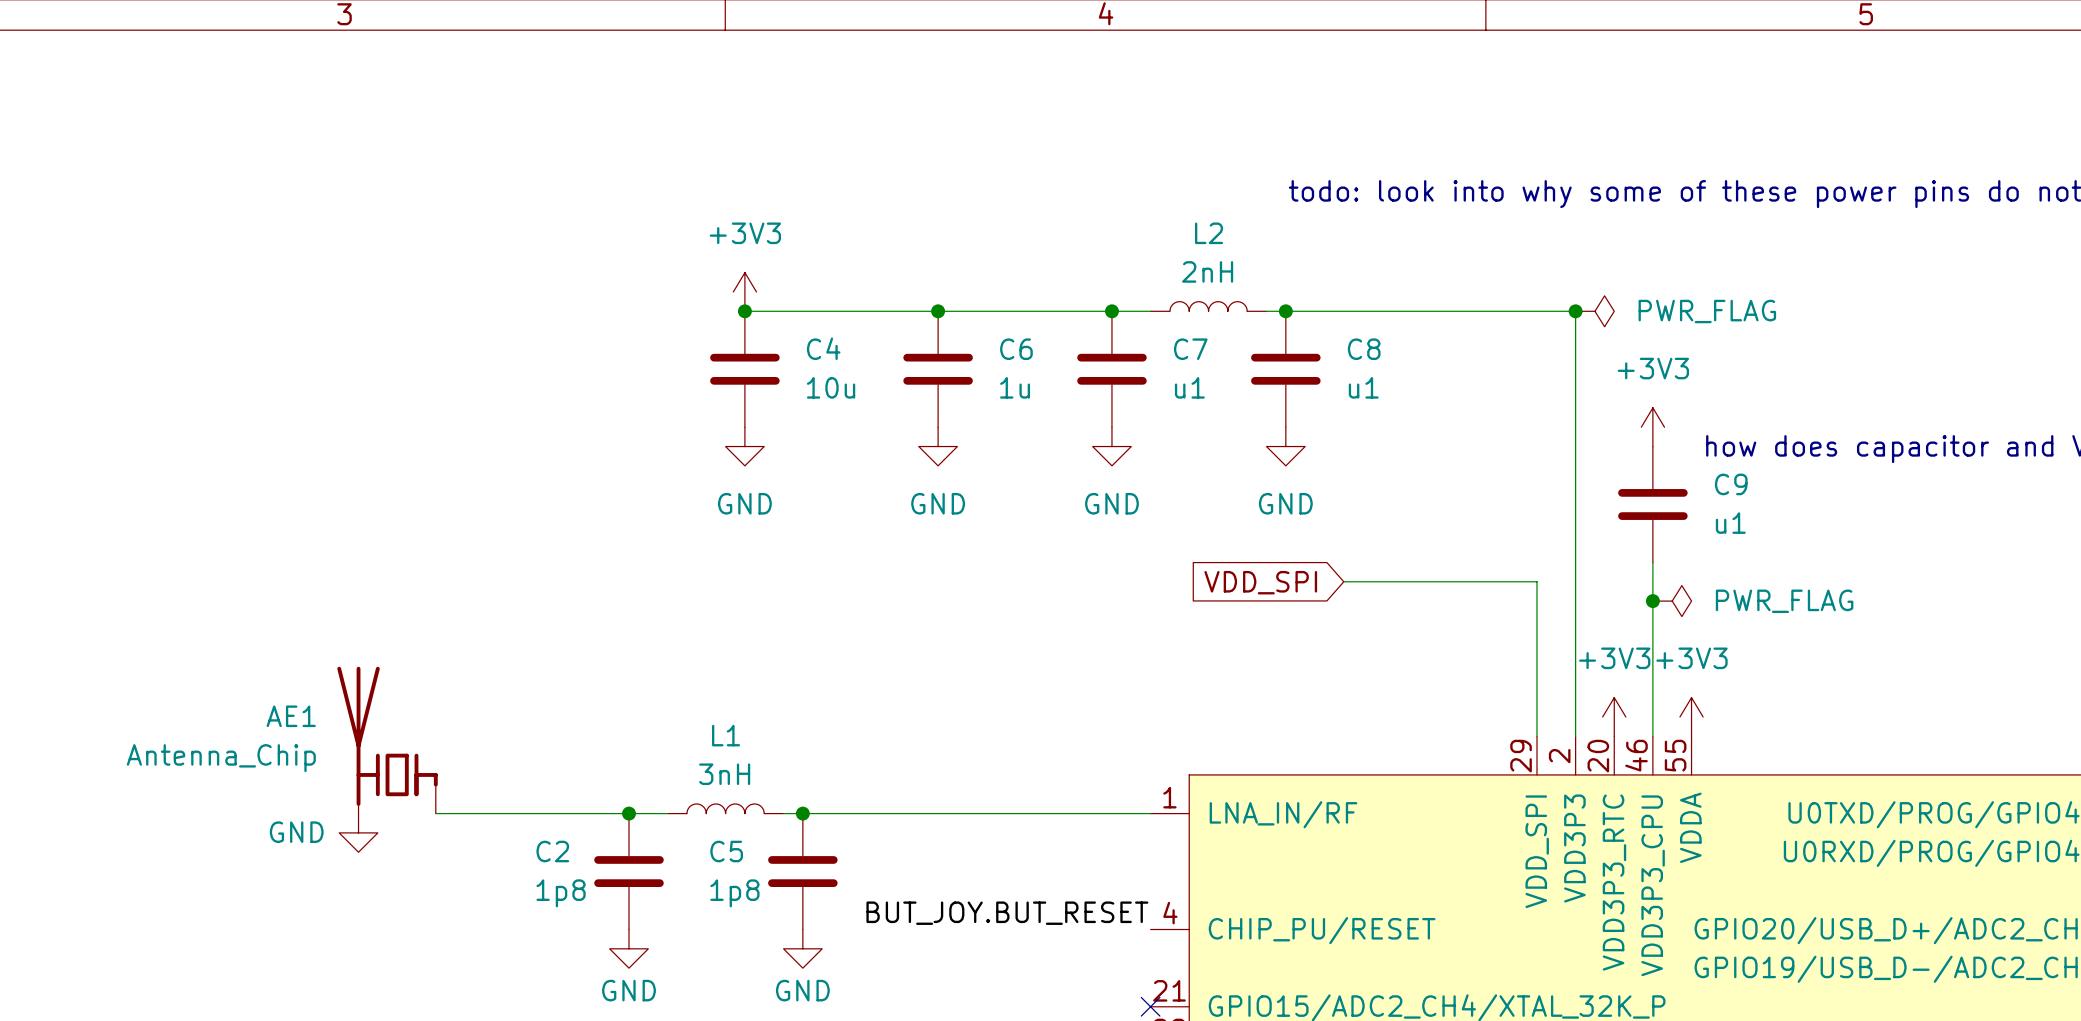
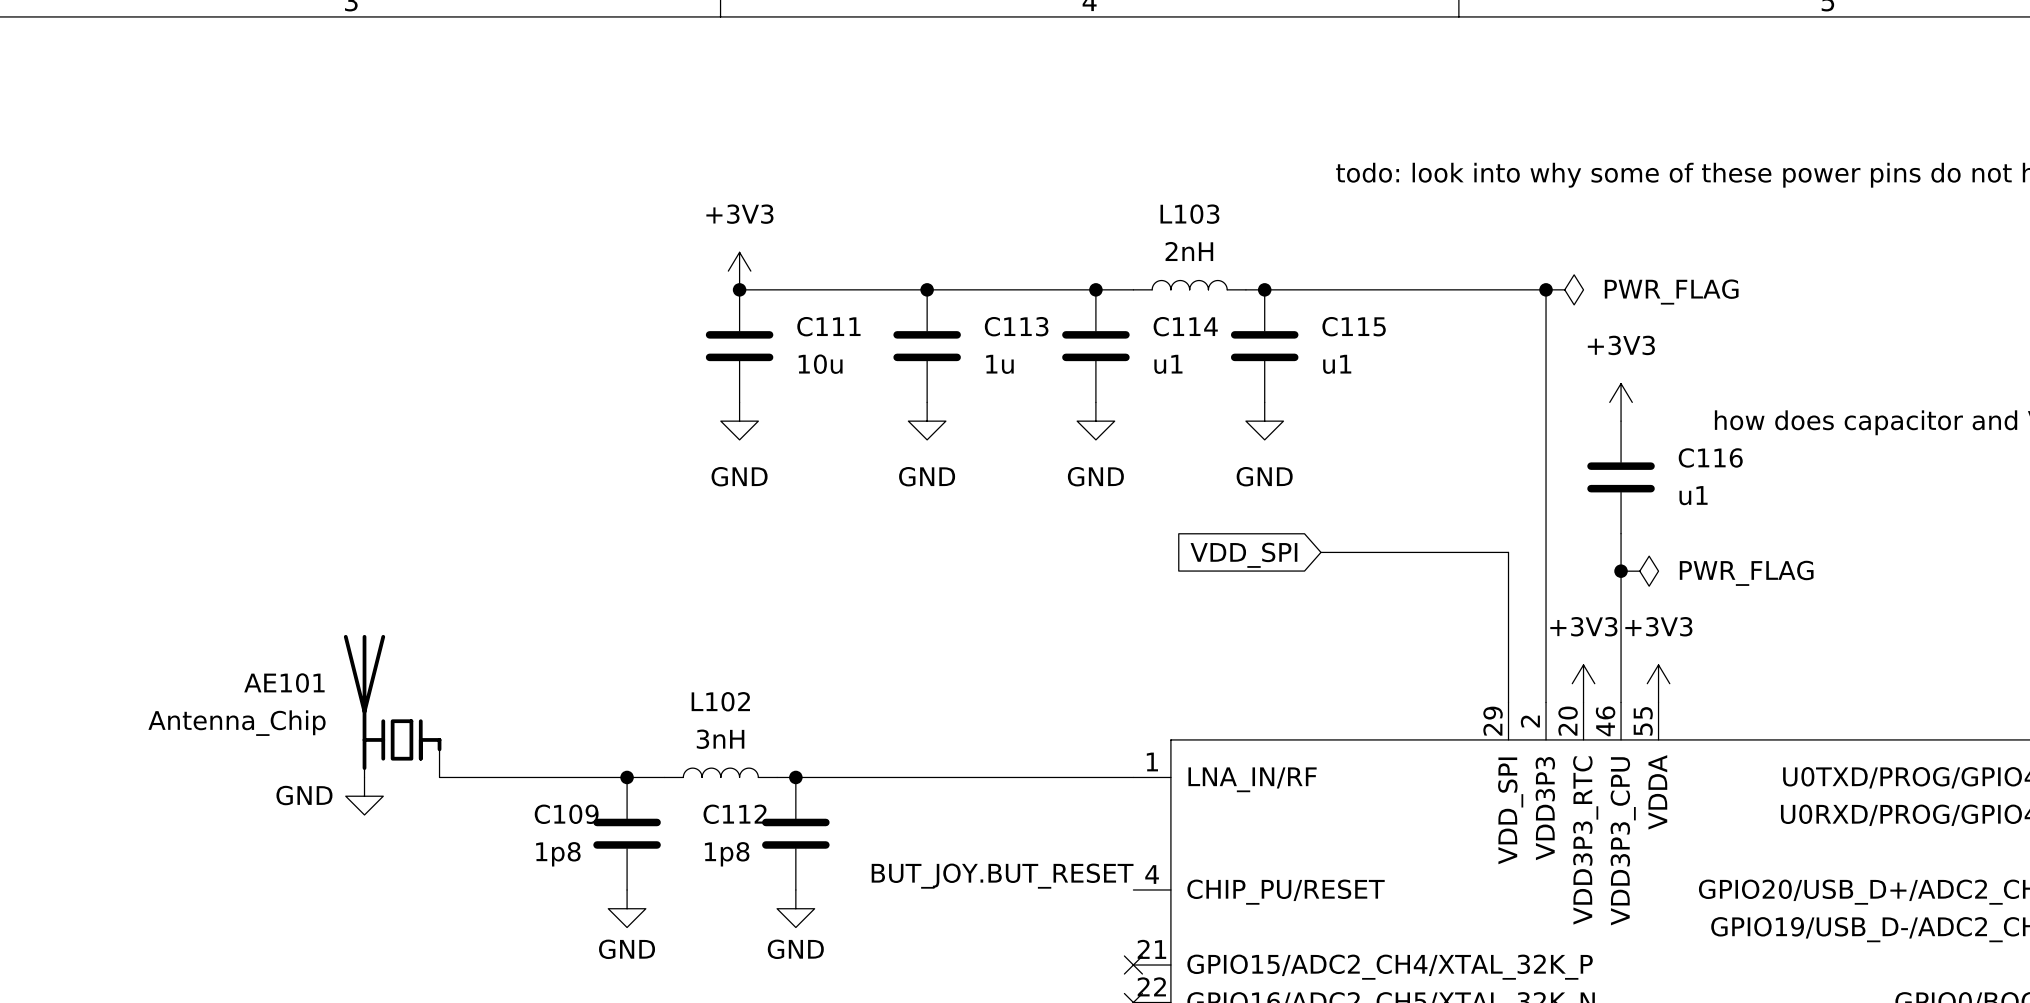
L2 name: L2 (1209, 233) -> L103 (1189, 214)
C4 name: C4 (823, 348) -> C111 (828, 326)
C6 name: C6 (1016, 349) -> C113 (1016, 326)
C7 name: C7 (1190, 349) -> C114 (1185, 326)
C8 name: C8 (1364, 349) -> C115 (1354, 326)
C9 name: C9 (1731, 484) -> C116 (1710, 457)
AE1 name: AE1 (291, 716) -> AE101 (284, 683)
L1 name: L1 (726, 735) -> L102 (720, 701)
C2 name: C2 (552, 851) -> C109 (566, 814)
C5 name: C5 (726, 851) -> C112 (735, 814)

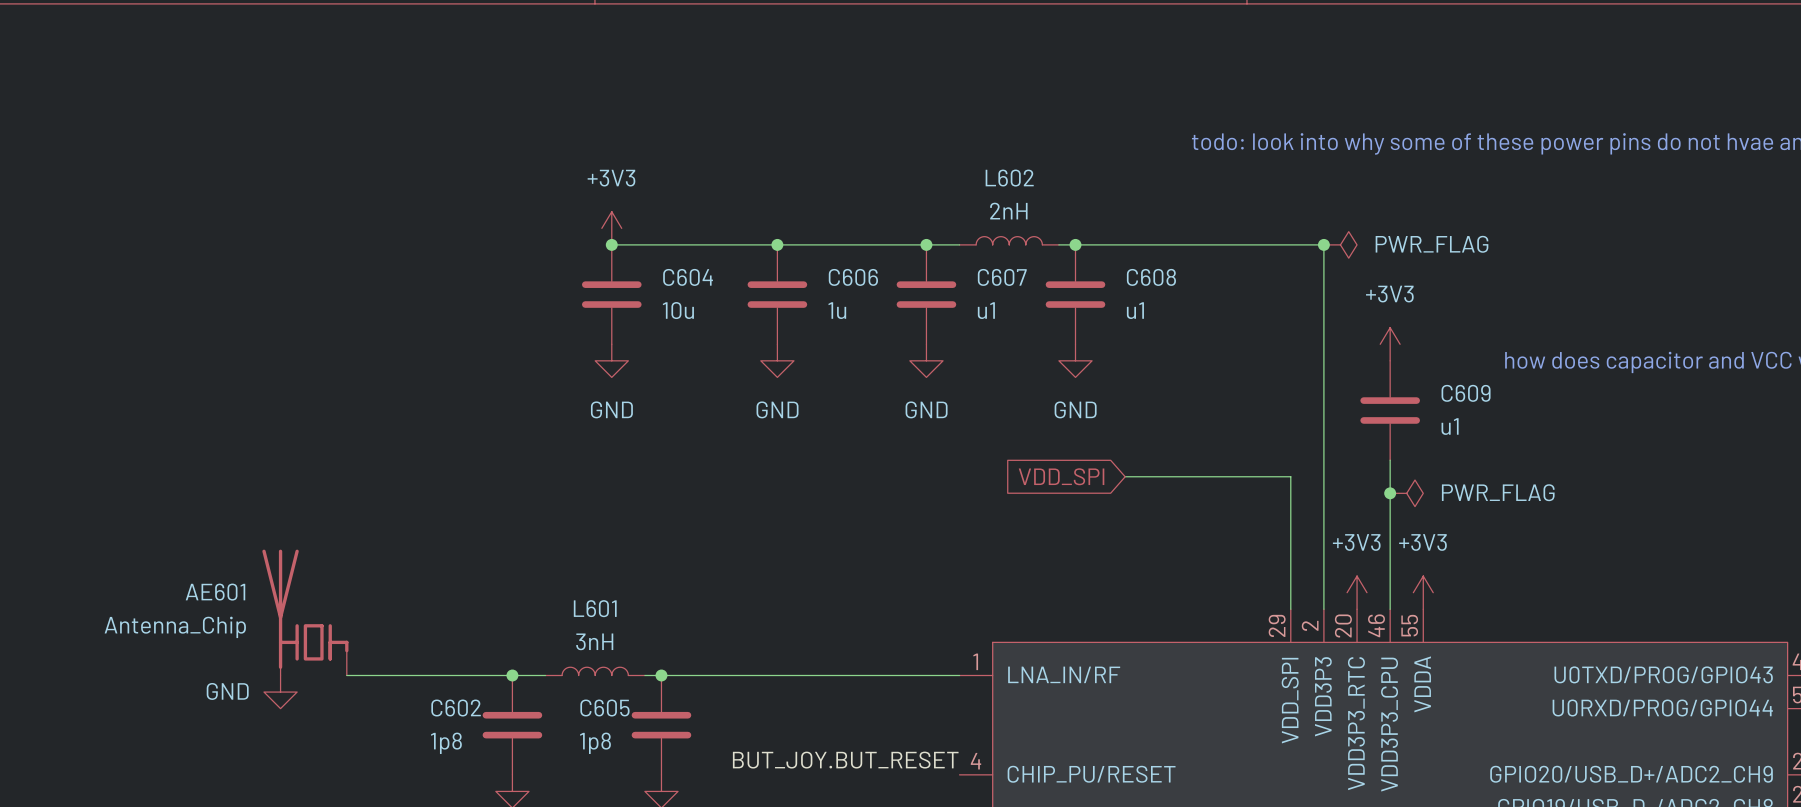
L103 name: L103 (1189, 214) -> L602 (1009, 178)
C111 name: C111 (828, 326) -> C604 (688, 277)
C113 name: C113 (1016, 326) -> C606 (853, 277)
C114 name: C114 (1185, 326) -> C607 (1002, 277)
C115 name: C115 (1354, 326) -> C608 (1151, 277)
C116 name: C116 (1710, 457) -> C609 (1466, 393)
AE101 name: AE101 (284, 683) -> AE601 (215, 592)
L102 name: L102 (720, 701) -> L601 (595, 608)
C109 name: C109 (566, 814) -> C602 (456, 708)
C112 name: C112 (735, 814) -> C605 (604, 708)

